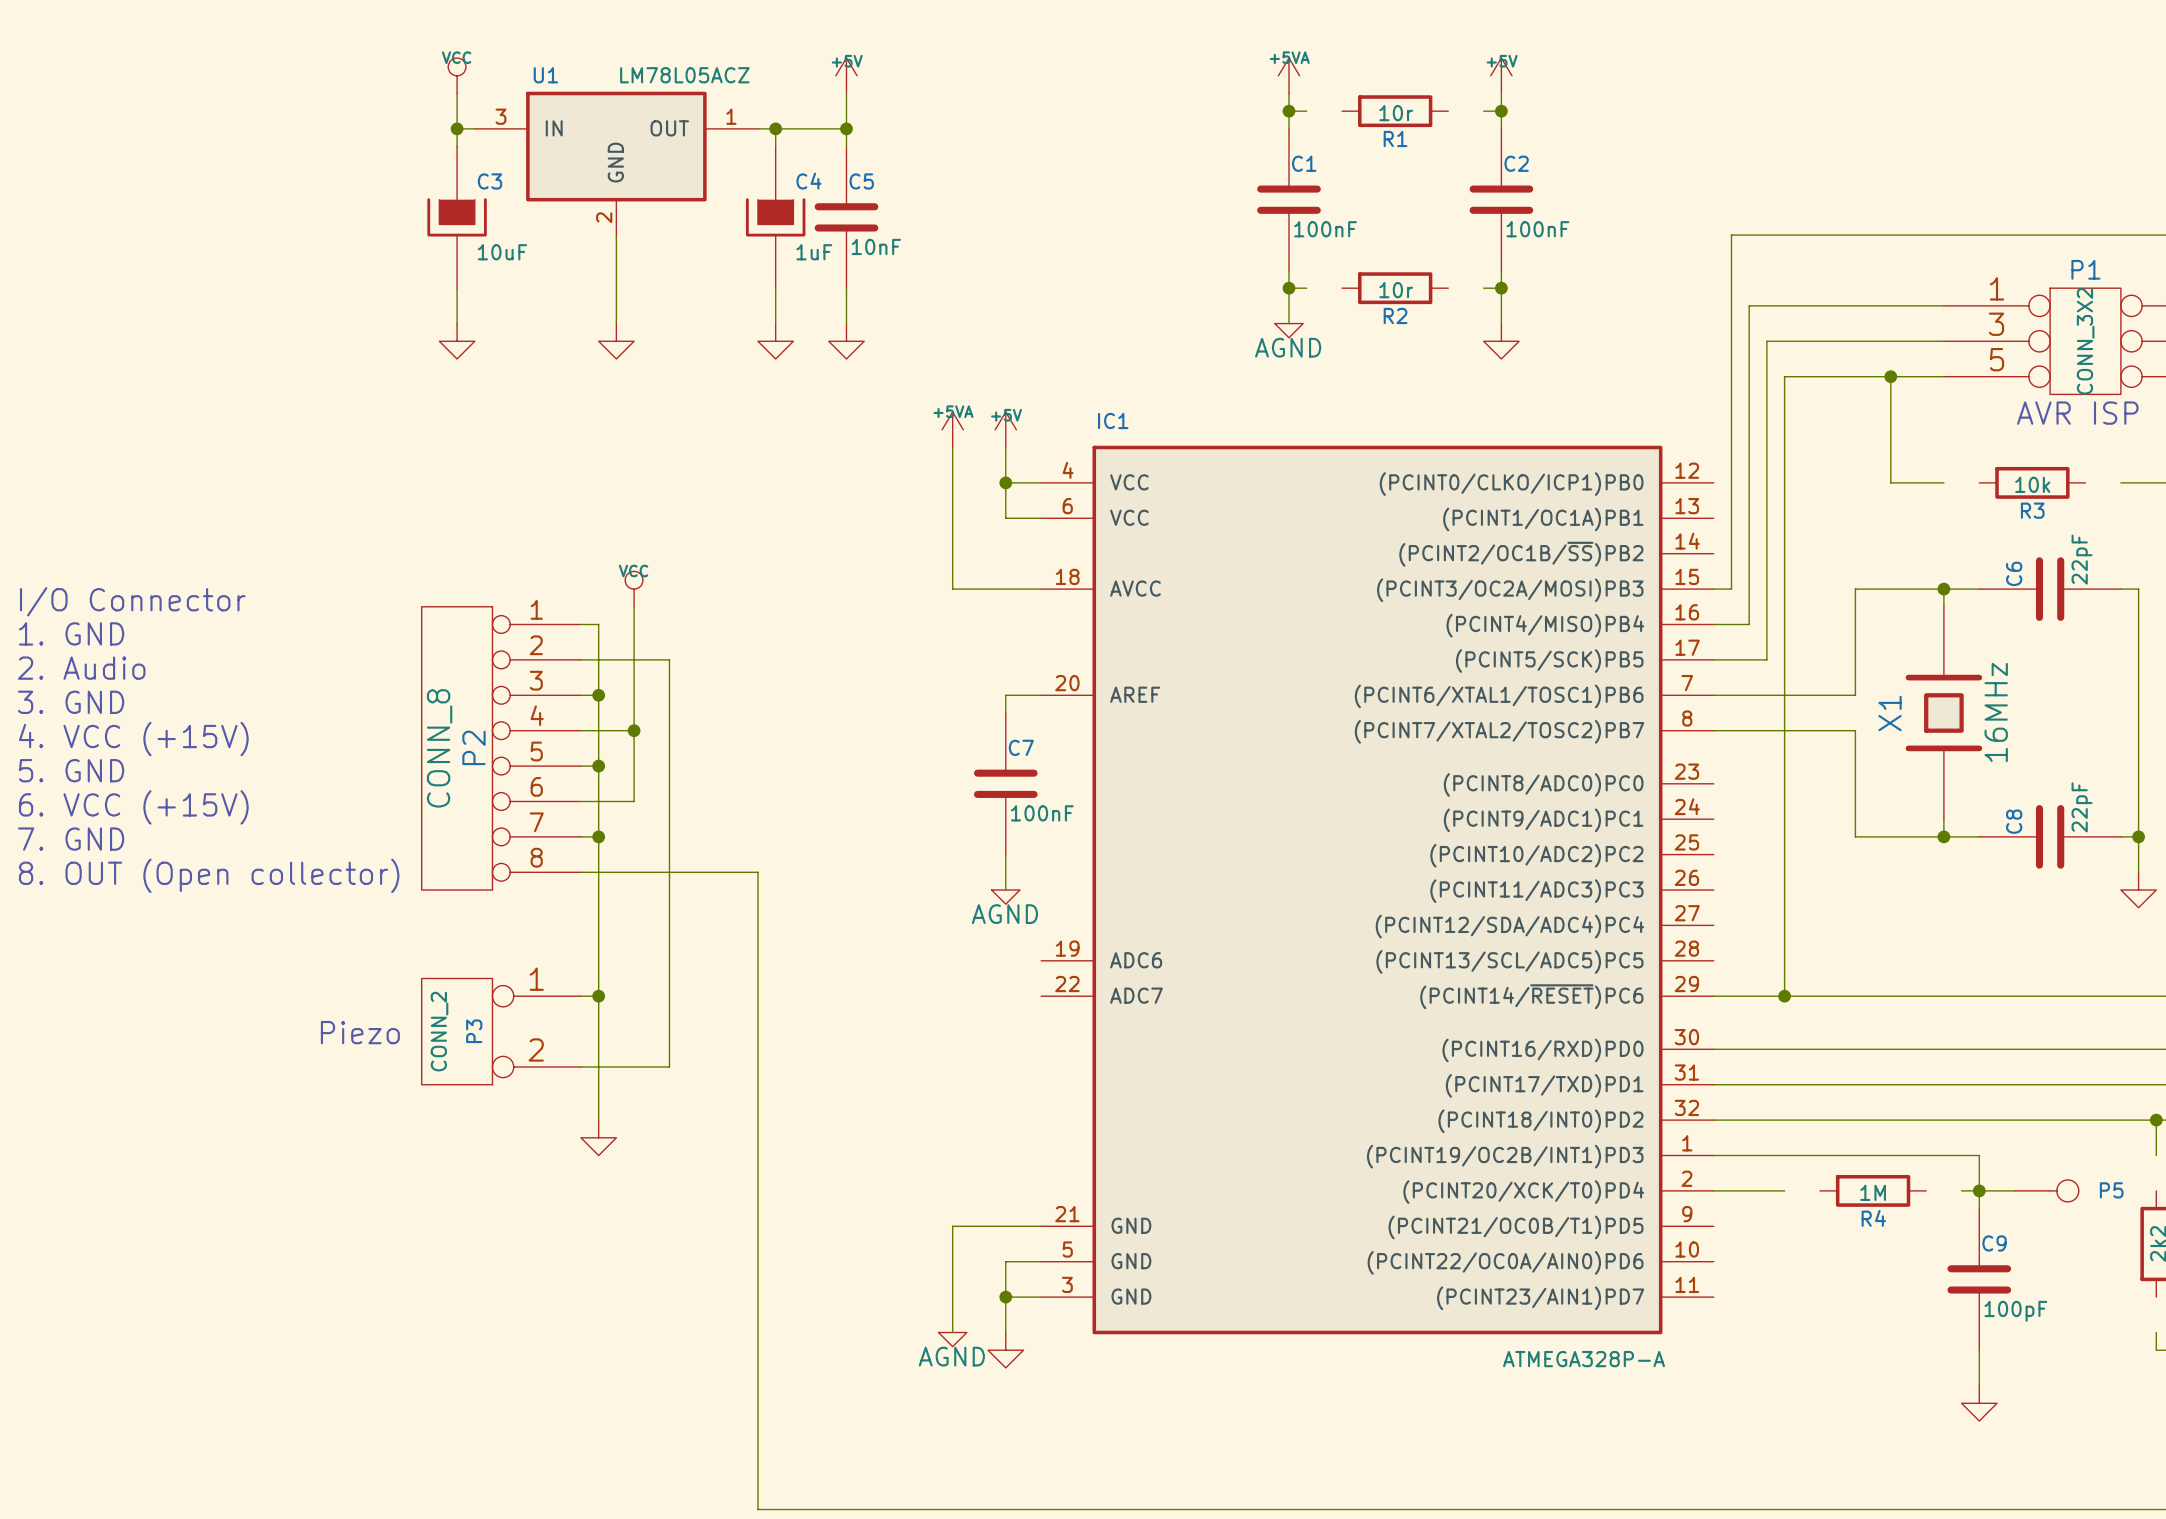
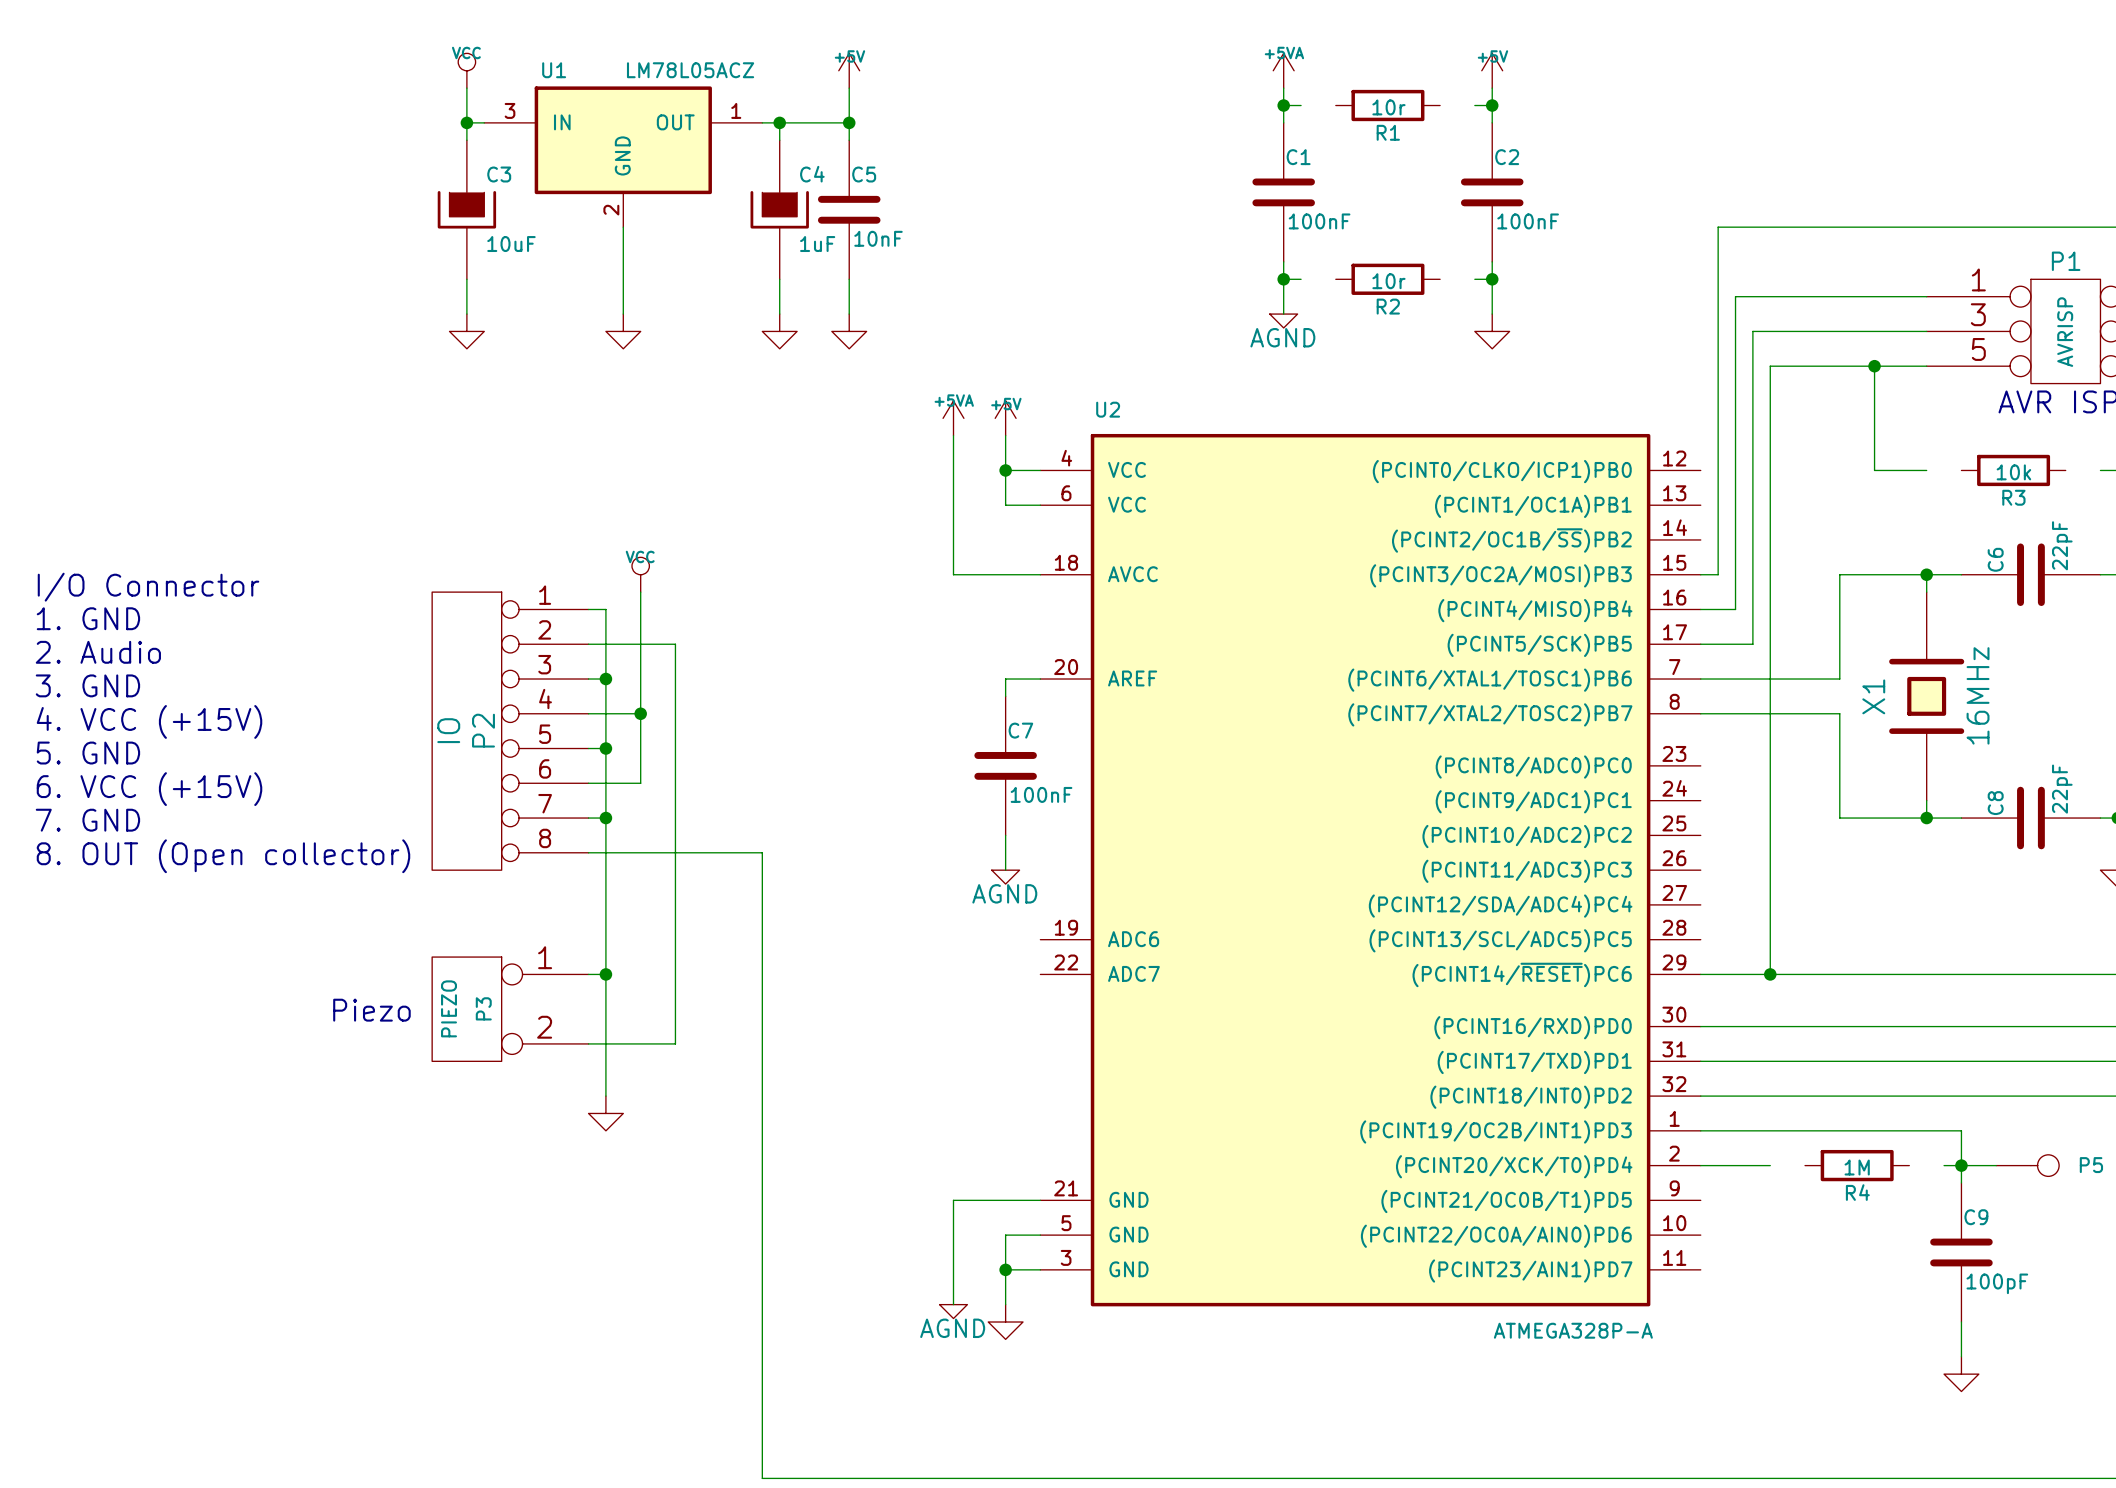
P1 value: CONN_3X2 (2085, 341) -> AVRISP (2065, 332)
IC1 name: IC1 (1113, 420) -> U2 (1108, 409)
P2 value: CONN_8 (439, 748) -> IO (448, 730)
P3 value: CONN_2 (439, 1031) -> PIEZO (449, 1008)

